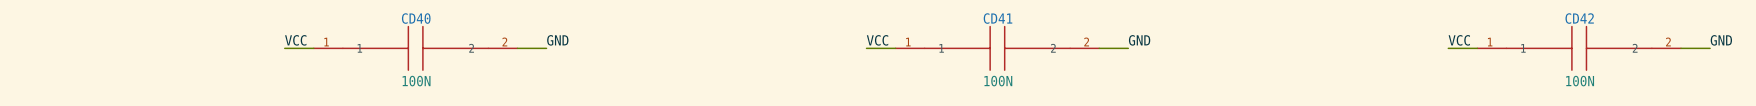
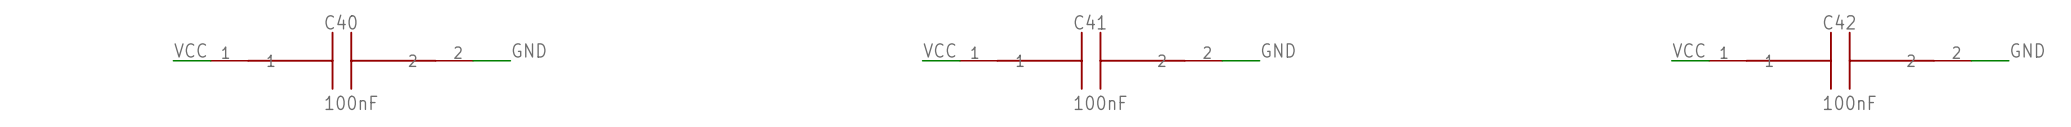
CD40 name: CD40 (416, 18) -> C40 (340, 22)
CD41 name: CD41 (998, 18) -> C41 (1090, 22)
CD42 name: CD42 (1579, 18) -> C42 (1839, 22)
CD40 value: 100N (416, 81) -> 100nF (351, 102)
CD41 value: 100N (998, 81) -> 100nF (1100, 102)
CD42 value: 100N (1580, 81) -> 100nF (1849, 102)

